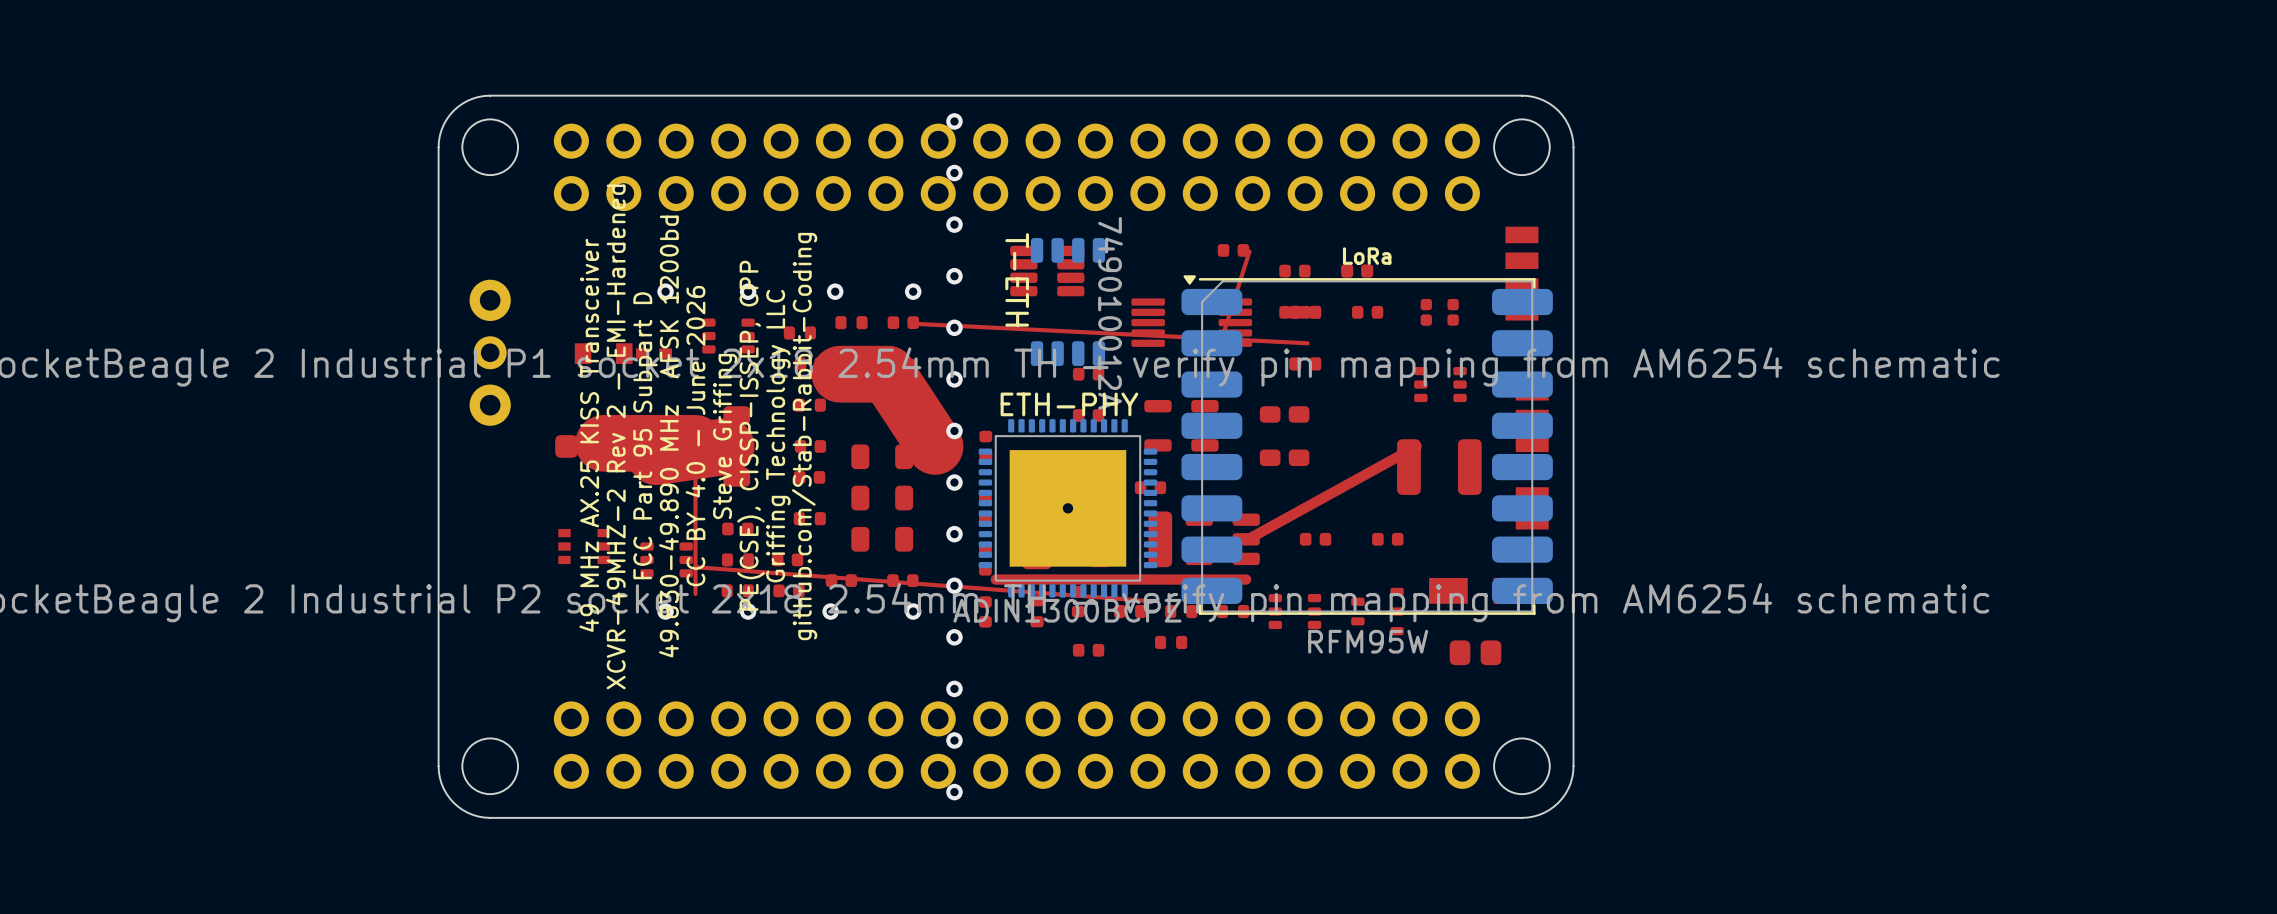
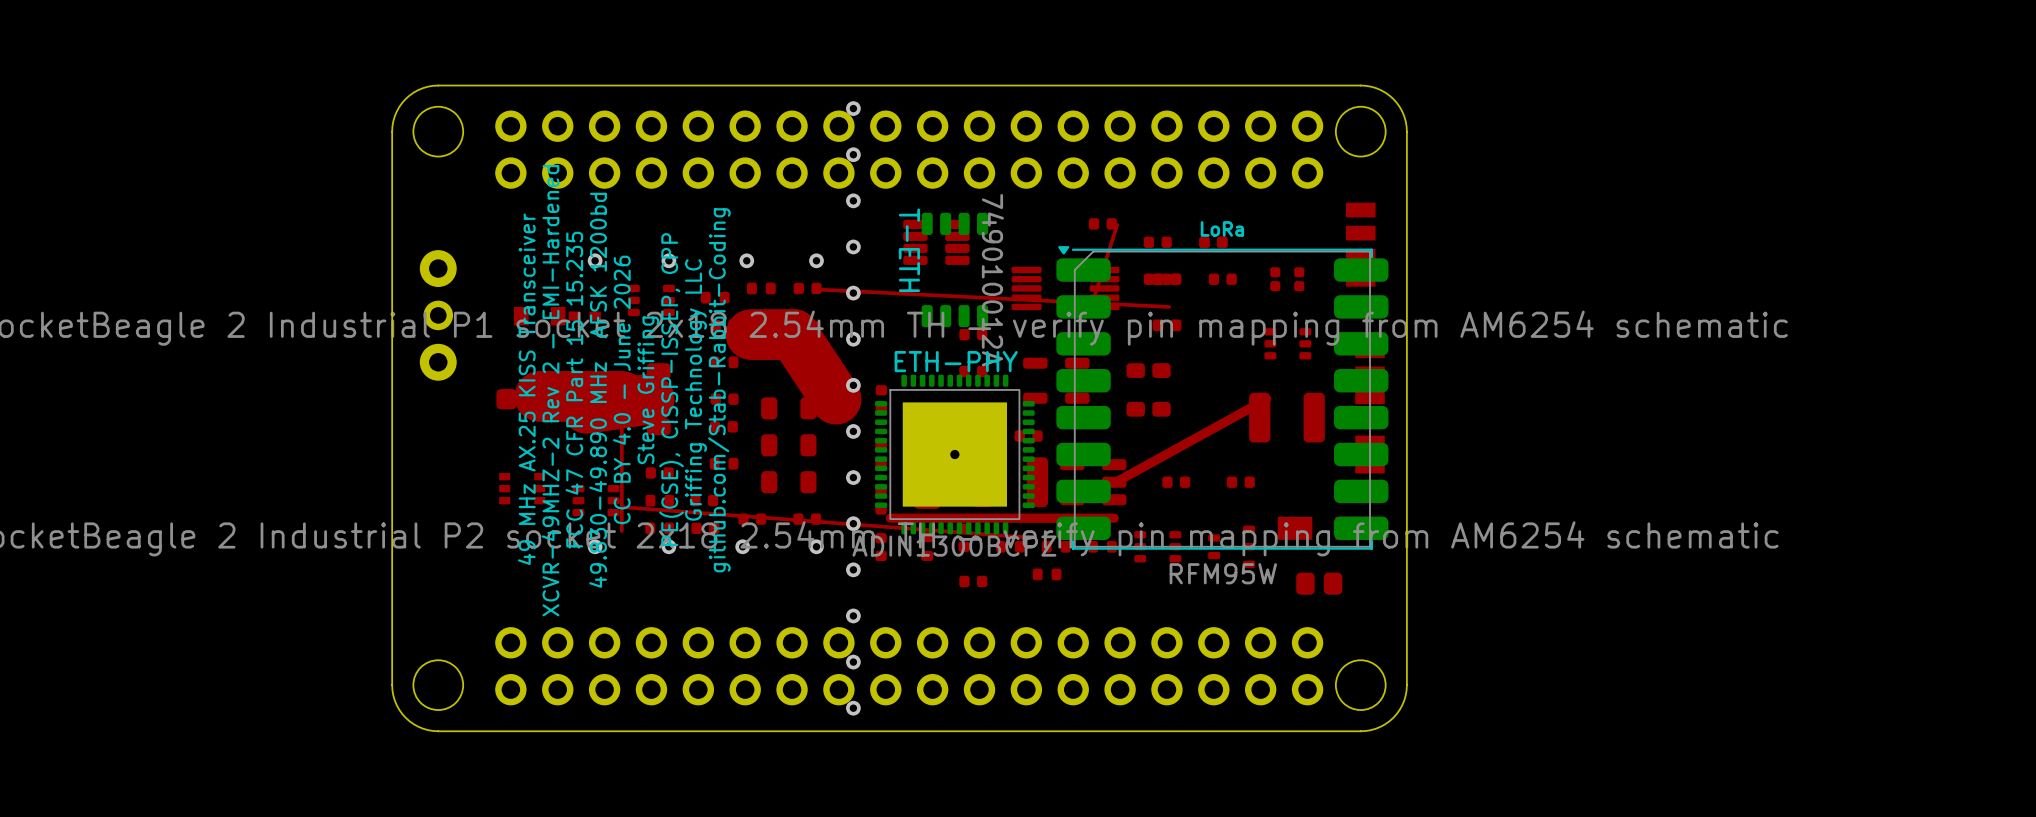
text: FCC Part 95 Subpart D (645, 435) -> FCC 47 CFR Part 15 15.235 (574, 389)

